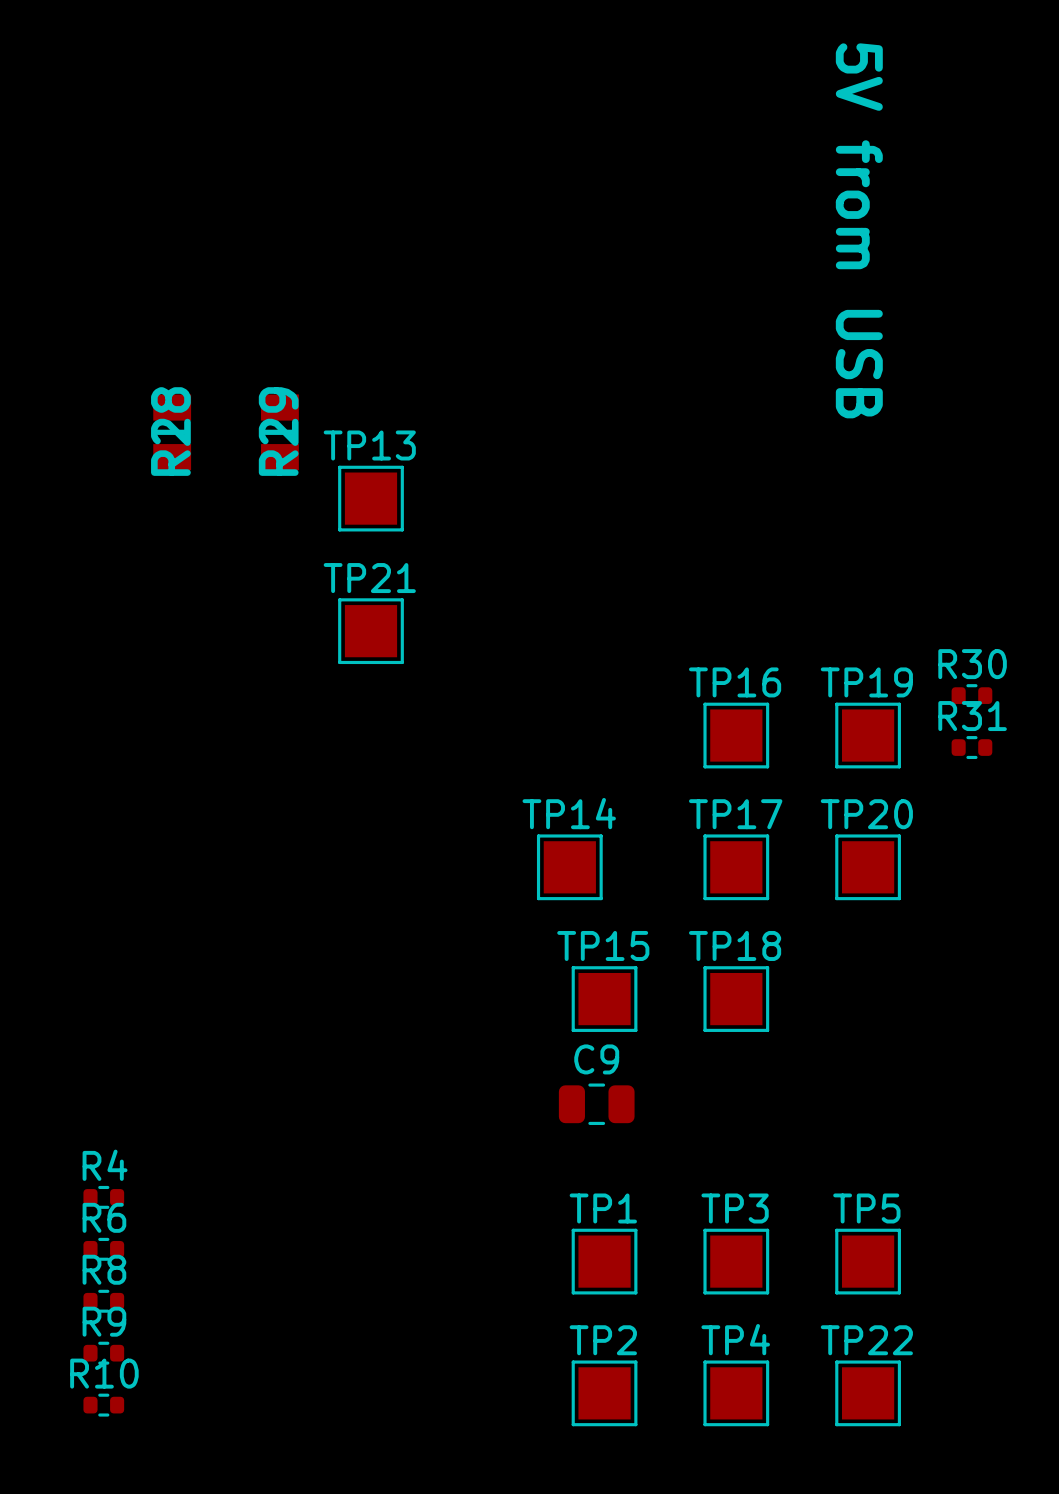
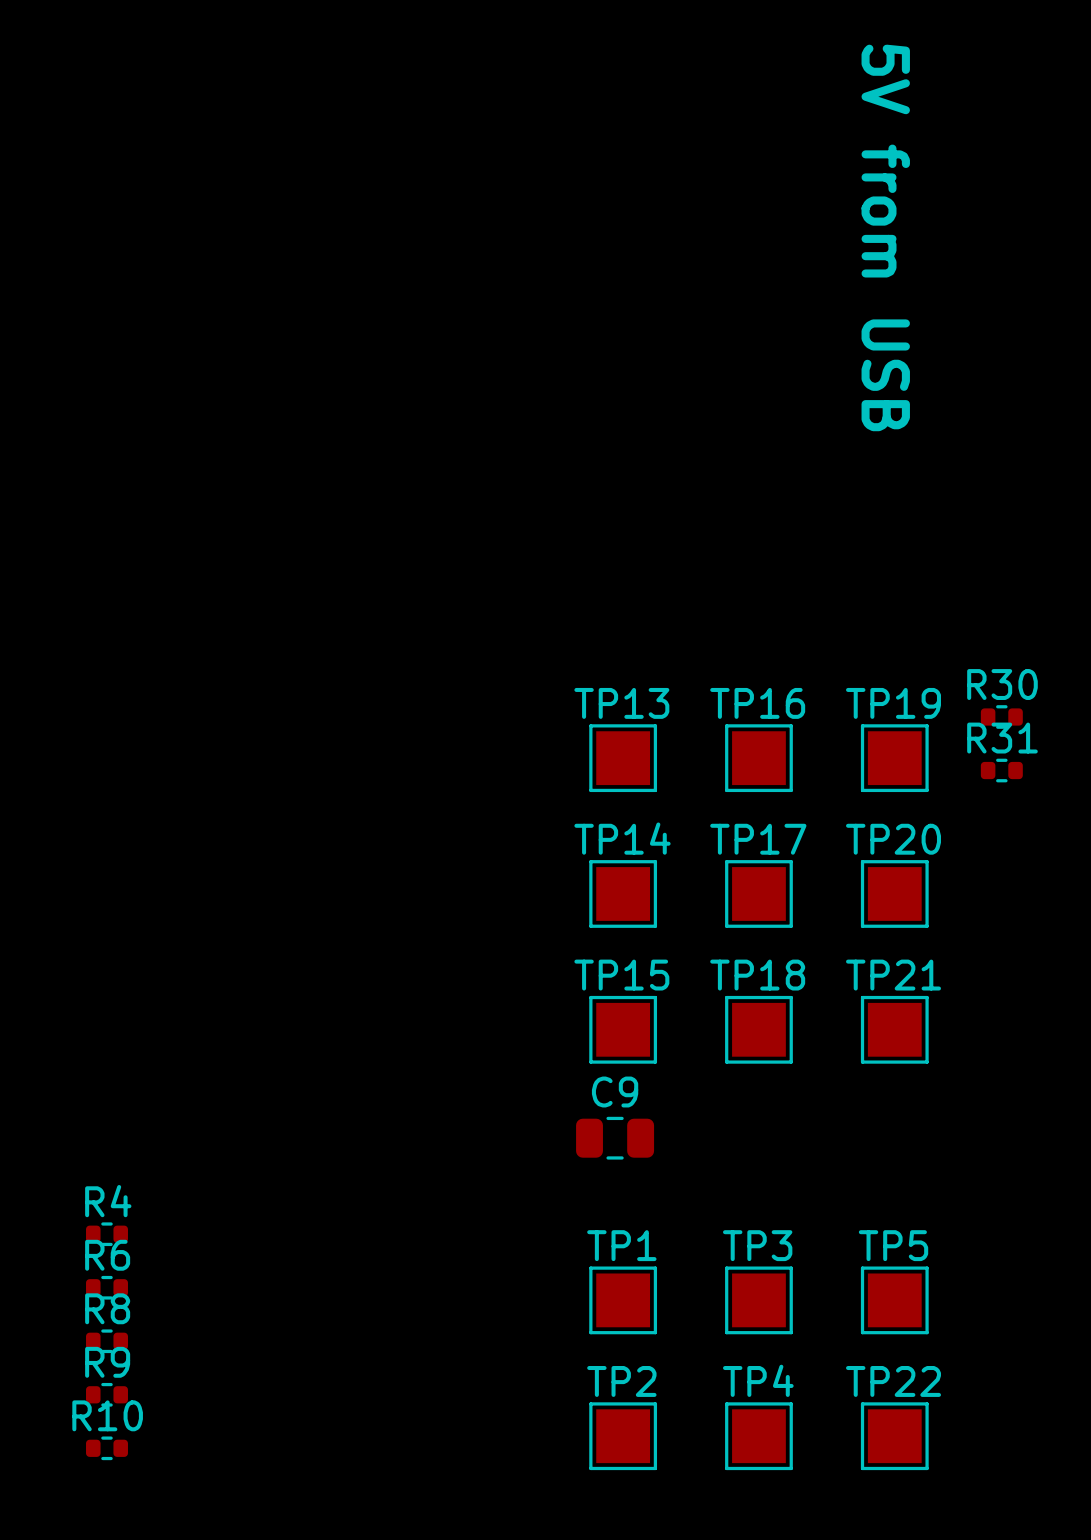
R28: (172, 432) -> none
R29: (279, 432) -> none
TP13 position: (371, 498) -> (623, 758)
TP21 position: (371, 631) -> (894, 1029)
TP14 position: (569, 867) -> (623, 893)

